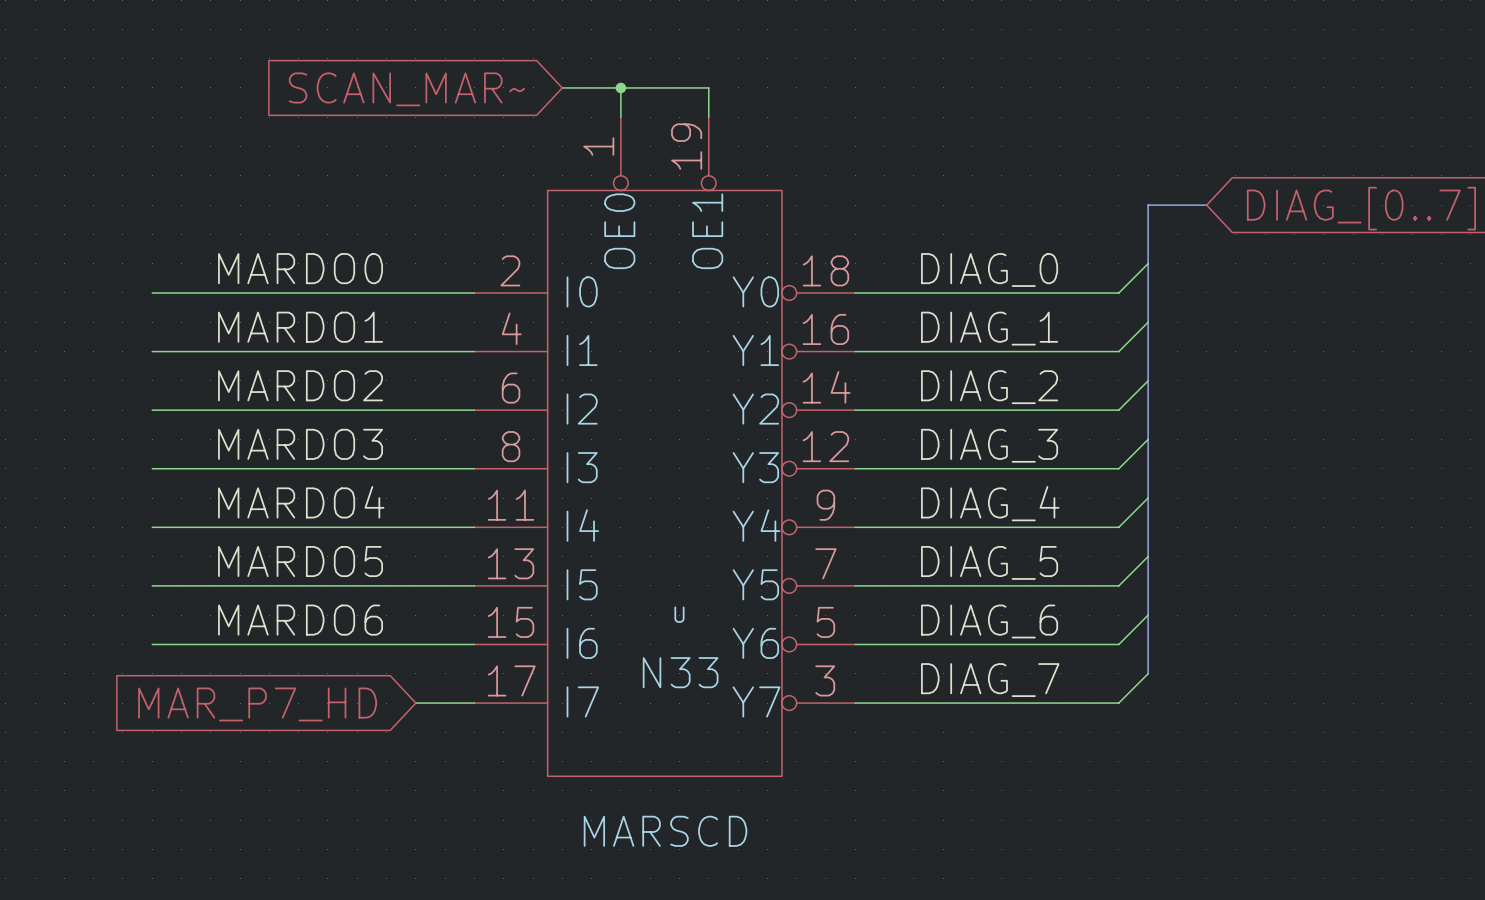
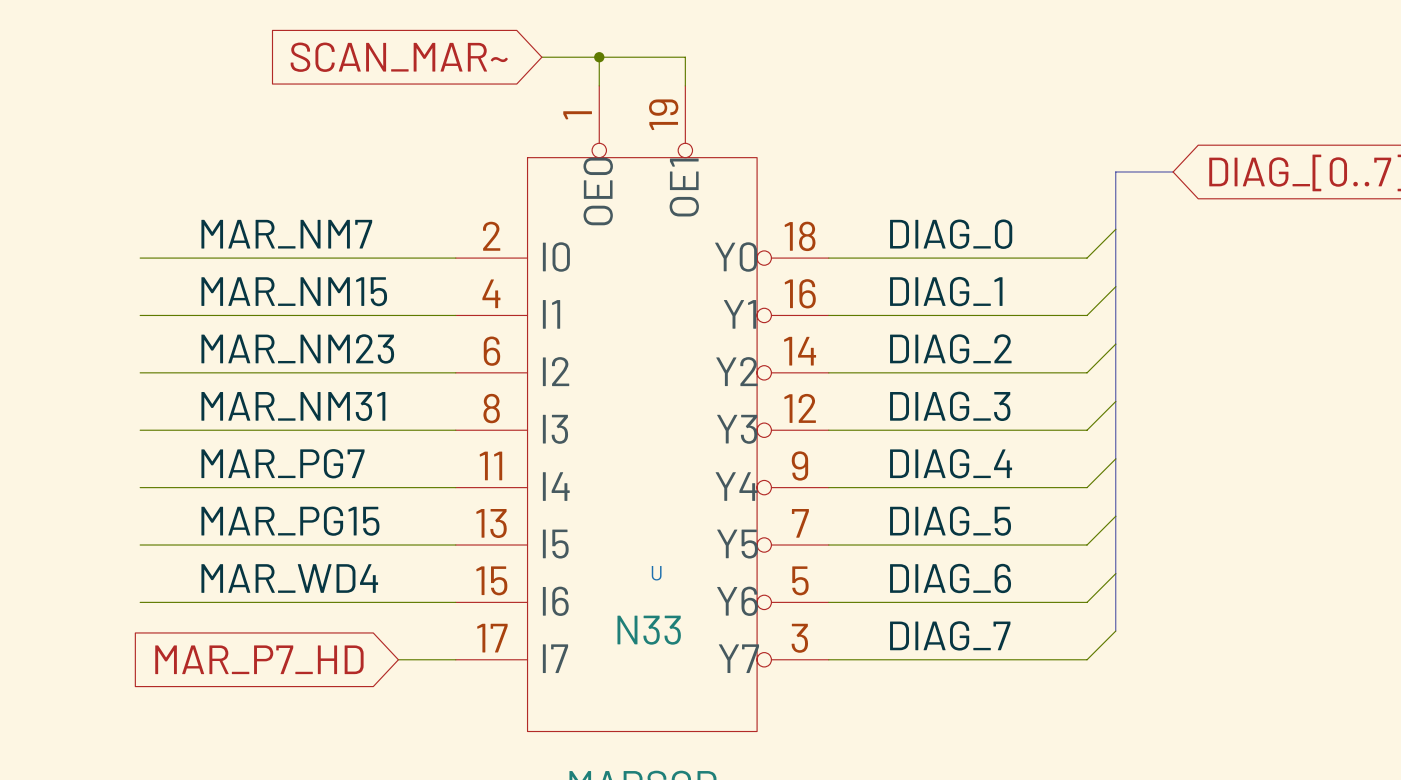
label: MARDO0 (300, 268) -> MAR_NM7 (286, 234)
label: MARDO1 (300, 327) -> MAR_NM15 (294, 291)
label: MARDO2 (300, 385) -> MAR_NM23 (297, 348)
label: MARDO3 (300, 444) -> MAR_NM31 (293, 406)
label: MARDO4 (301, 502) -> MAR_PG7 (282, 463)
label: MARDO5 (300, 561) -> MAR_PG15 (290, 521)
label: MARDO6 (300, 620) -> MAR_WD4 (289, 578)

